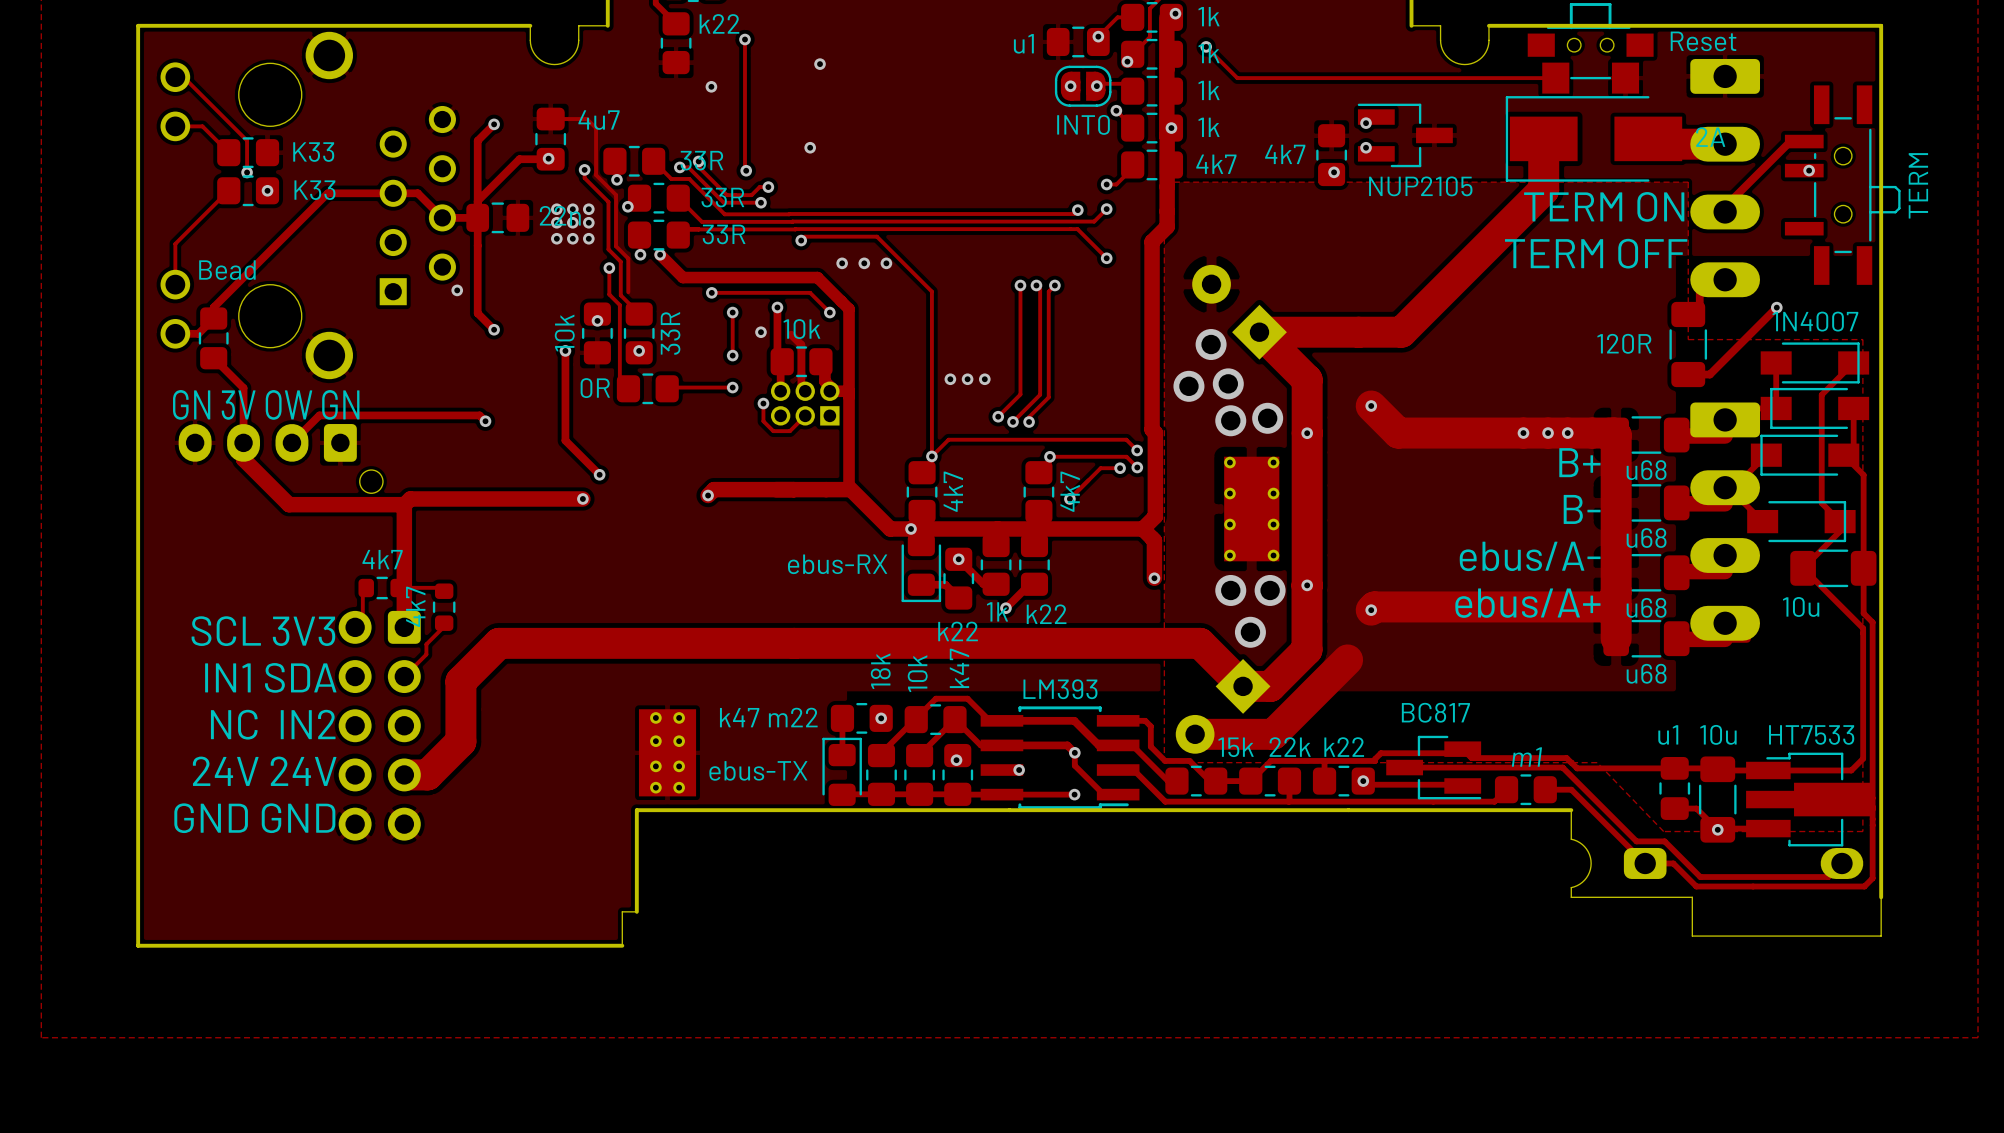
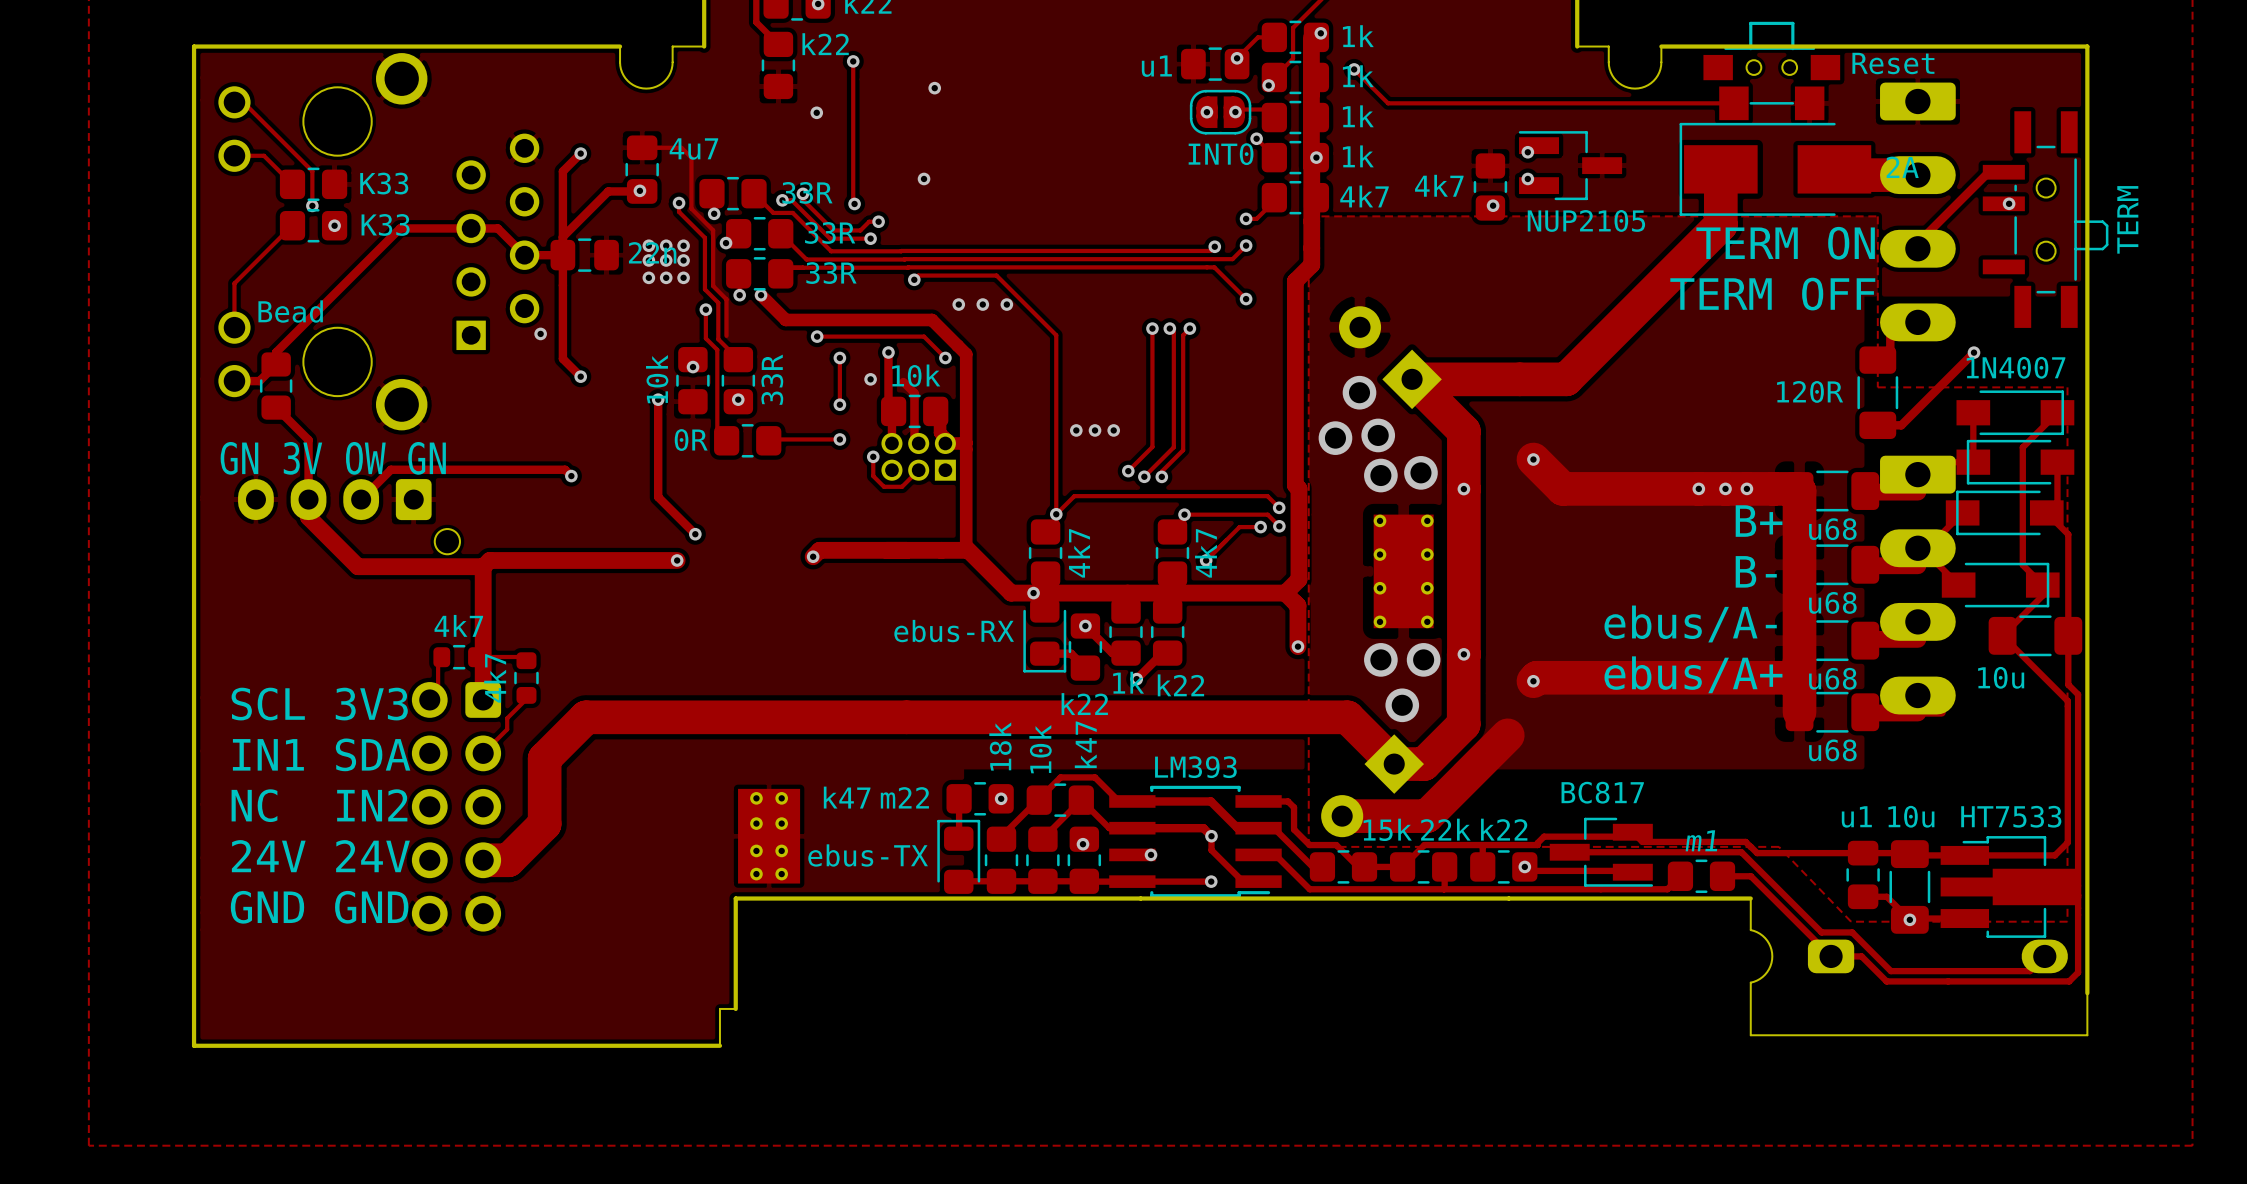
board edge: (1571, 897) (1692, 897) (1692, 936) -> (1750, 993) (1750, 1035) (1882, 1035)

